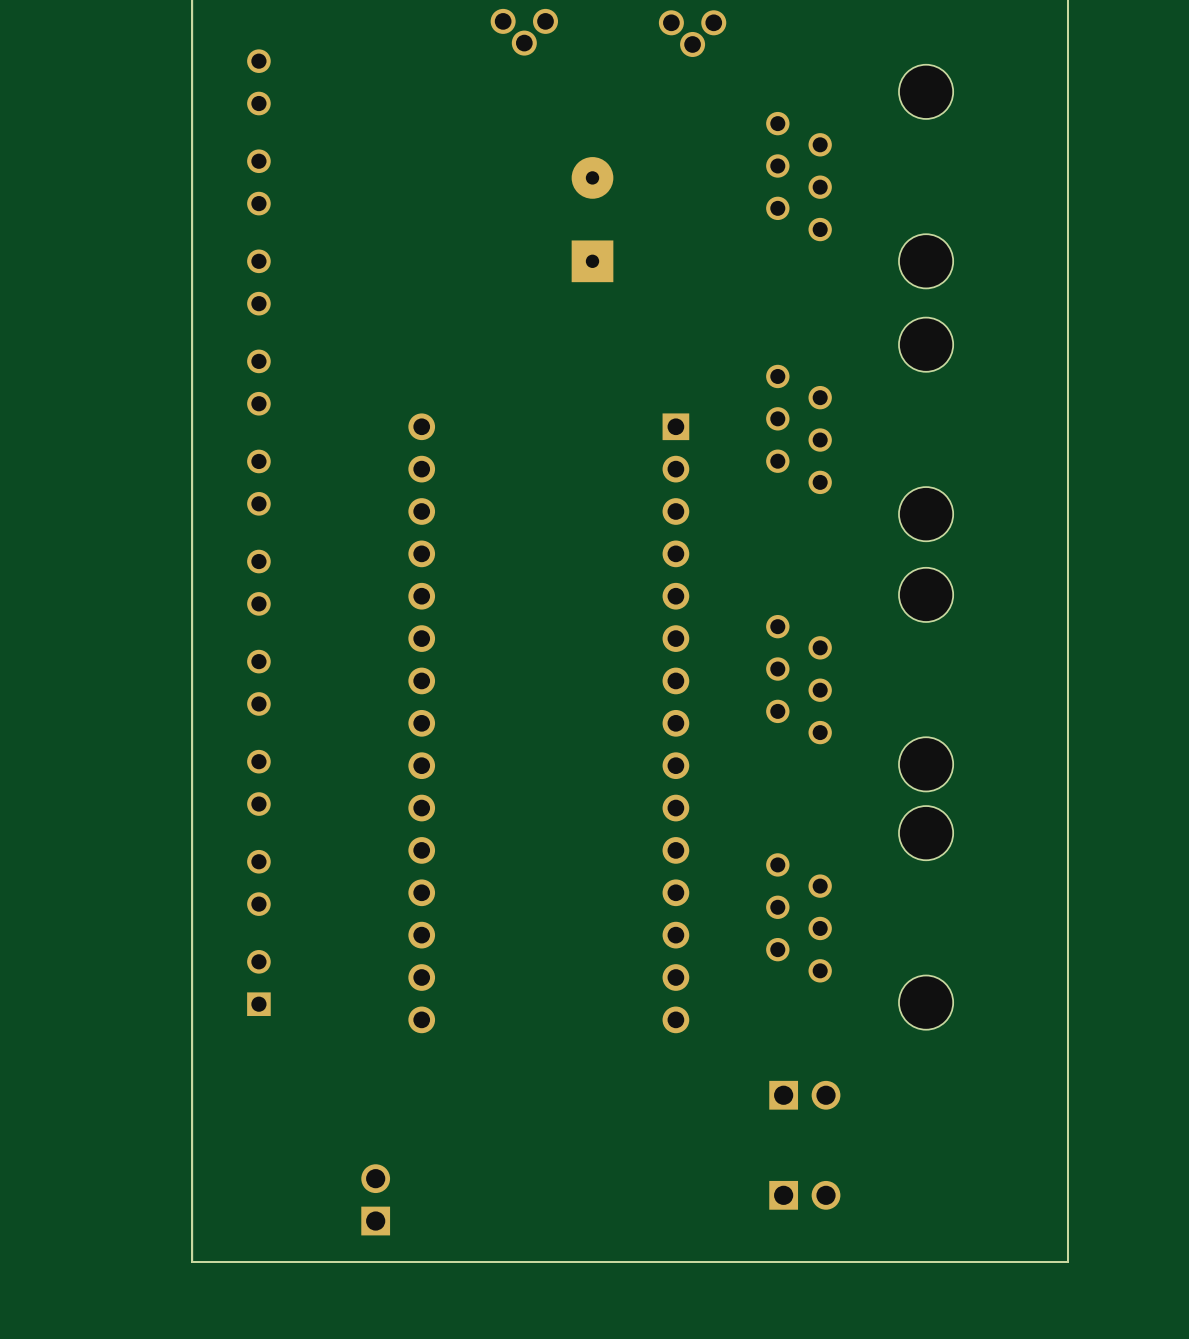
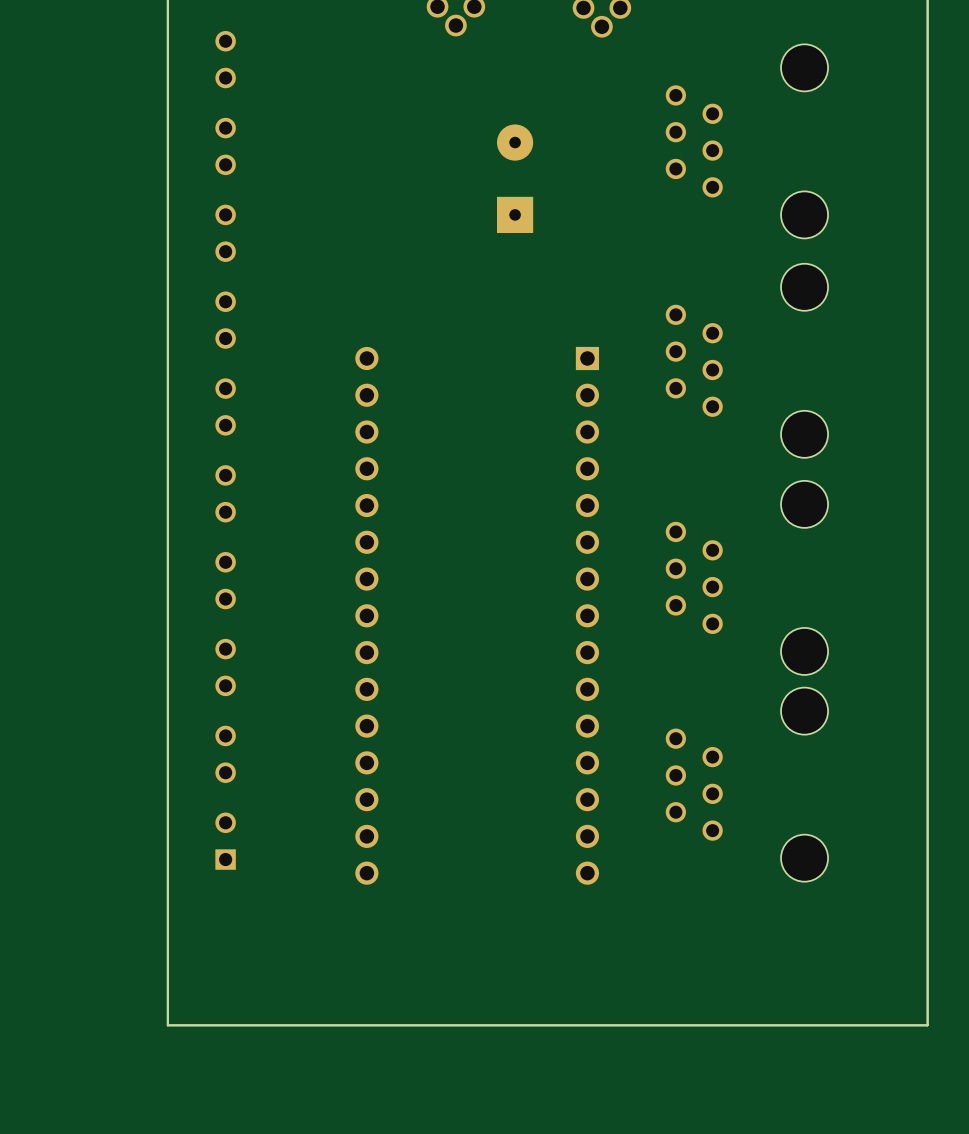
part: (804, 1095) -> none
part: (804, 1195) -> none
board edge: (1067, 1195) (1067, 1262) (192, 1262) (192, 1195) -> (927, 1025) (167, 1025)
part: (375, 1199) -> none

